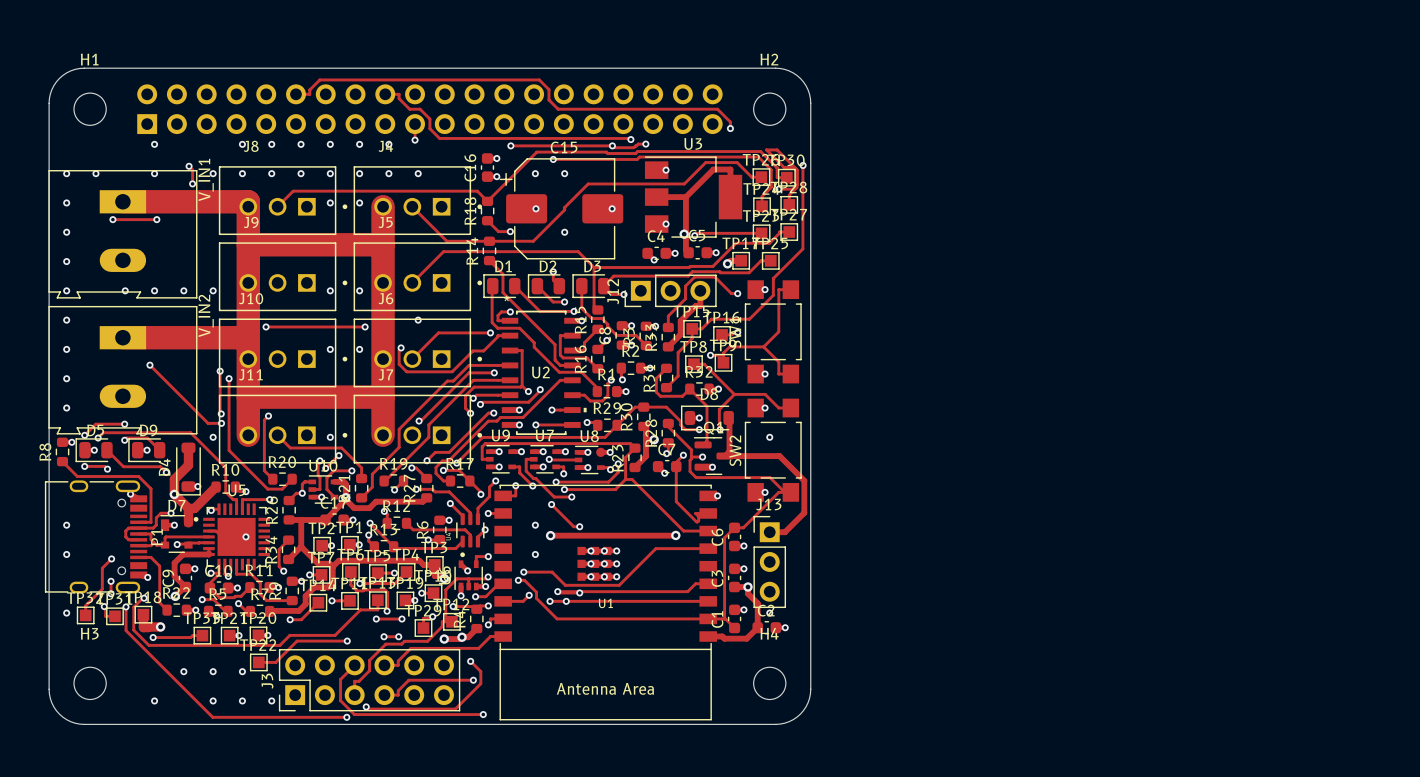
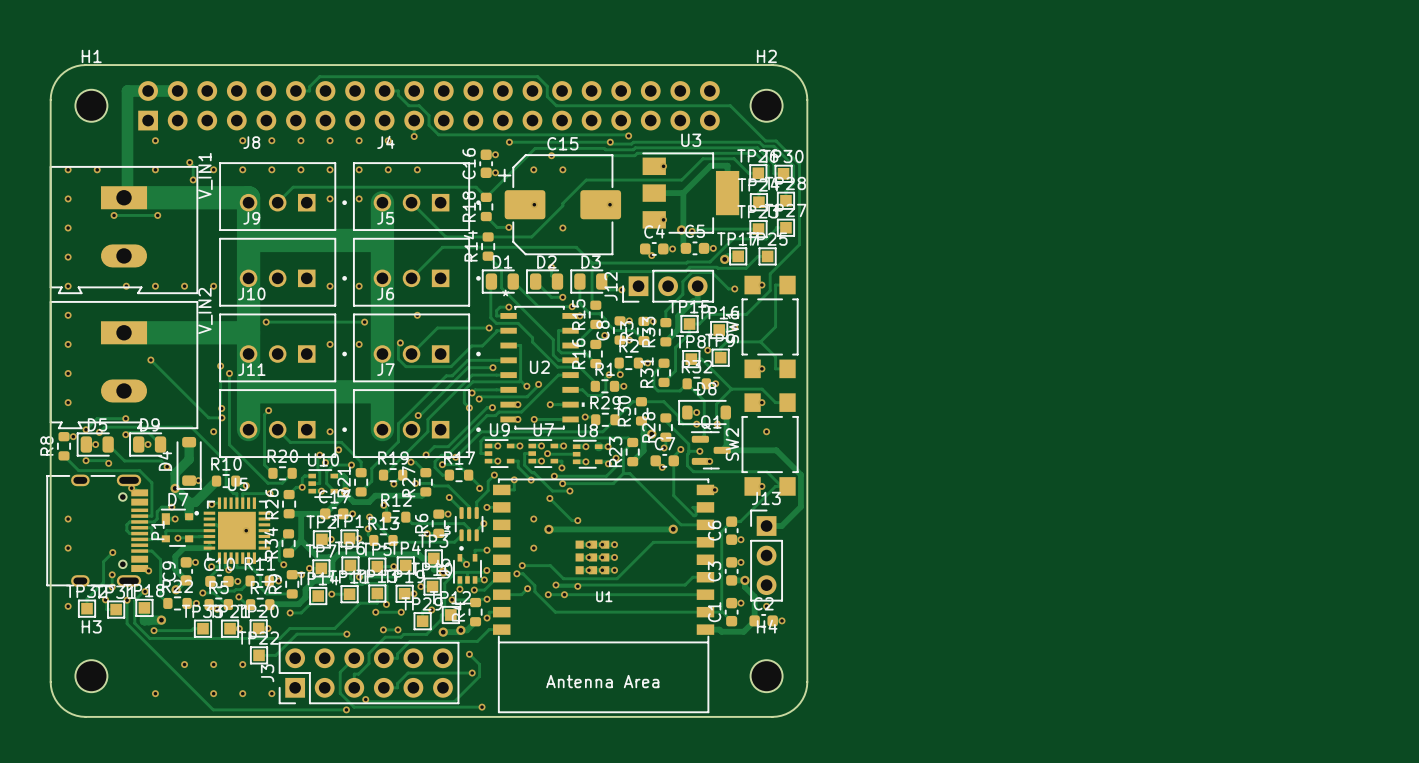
track: none -> (177, 90) (127, 90) (127, 197)
track: (717, 109) (730, 122) (730, 128) -> (714, 105) (730, 105) (765, 140) (776, 140) (799, 164)
via: (730, 128) -> none
track: (645, 144) (635, 145) -> (763, 146) (759, 142) (633, 142)
via: (645, 144) -> none
track: (766, 149) (784, 167) (794, 167) (797, 170) (797, 185) (792, 189) (778, 189) -> none
via: (803, 165) -> none
via: (778, 189) -> none

